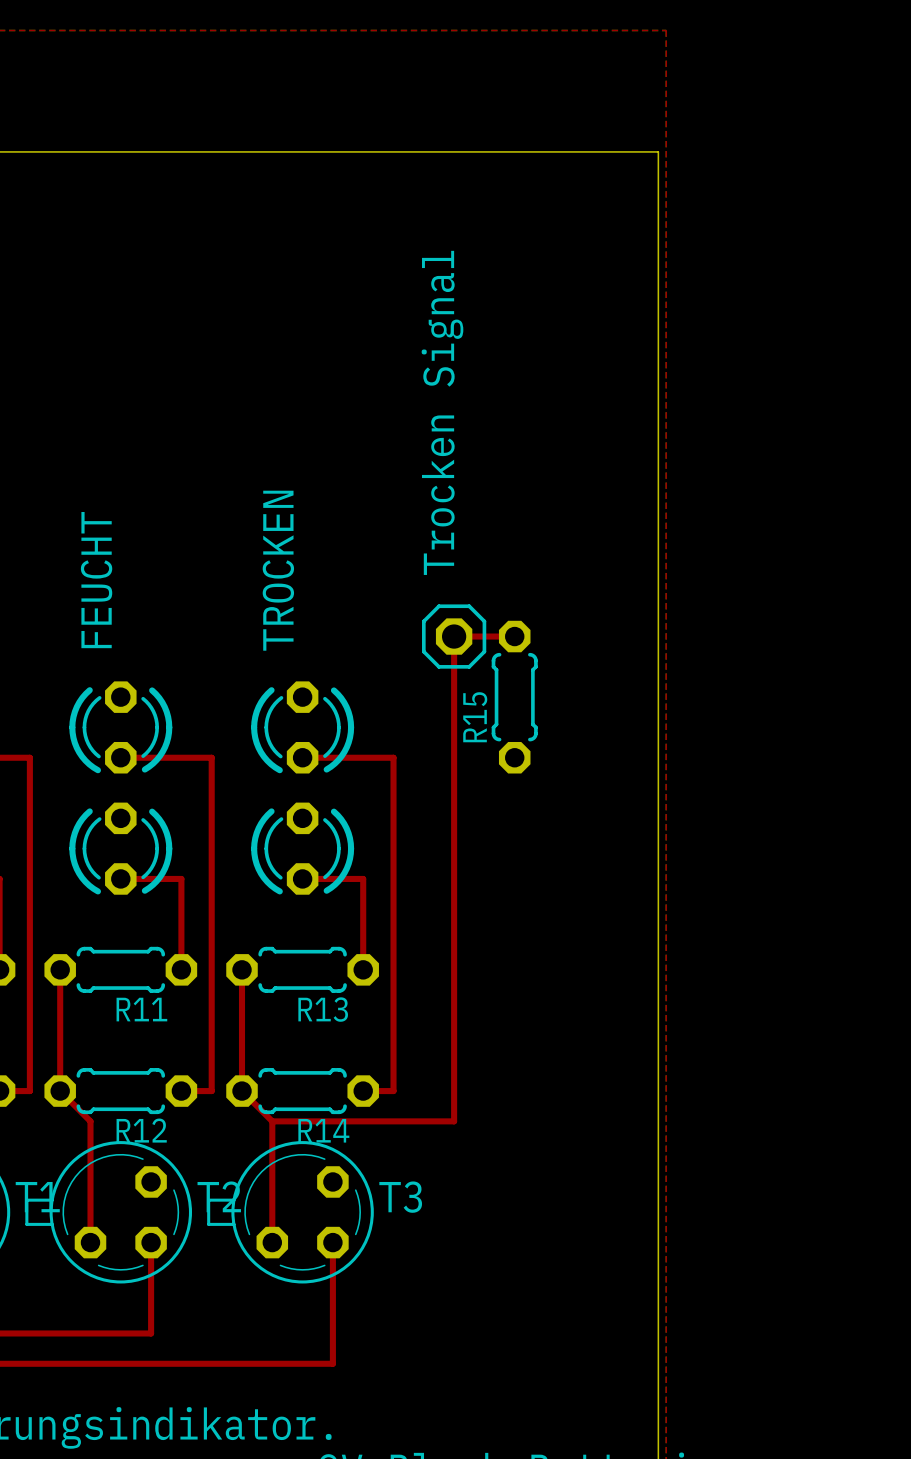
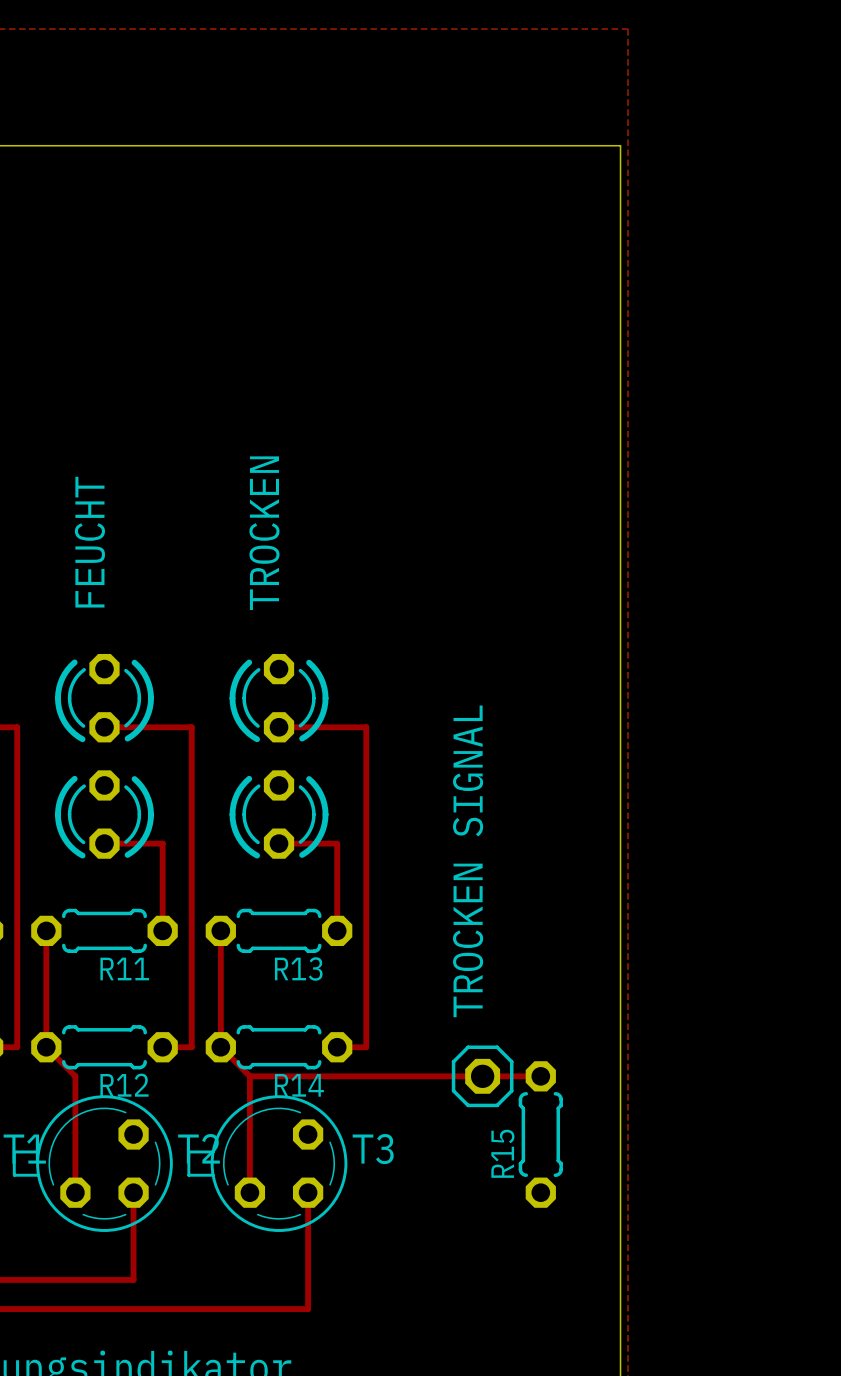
text: Trocken Signal (442, 412) -> none
text: none -> TROCKEN (264, 533)
text: none -> FEUCHT (89, 542)
TROCKEN name: TROCKEN (278, 570) -> none
FEUCHT name: FEUCHT (96, 580) -> none
part position: (454, 636) -> (482, 1076)
top track: (514, 636) (454, 636) (454, 1121) -> (540, 1076) (424, 1076)
R15 position: (514, 697) -> (540, 1134)
text: none -> TROCKEN SIGNAL (468, 861)

